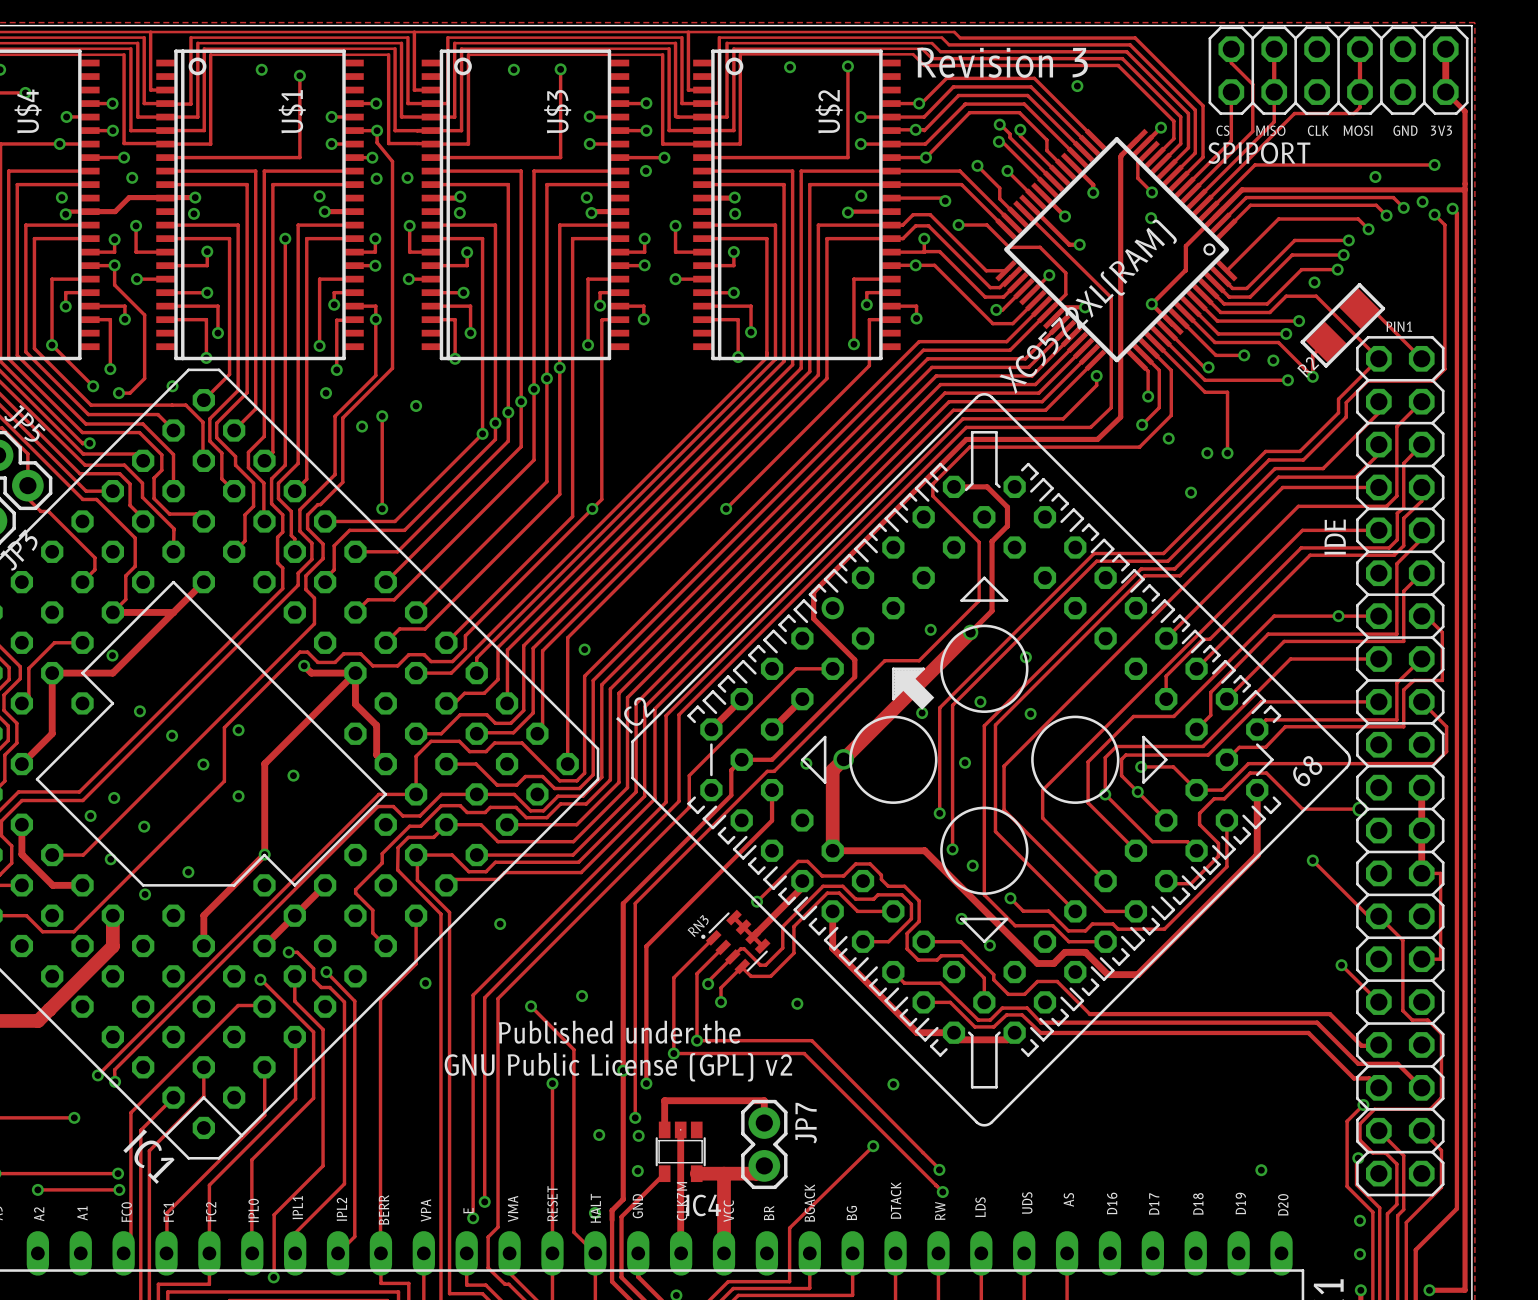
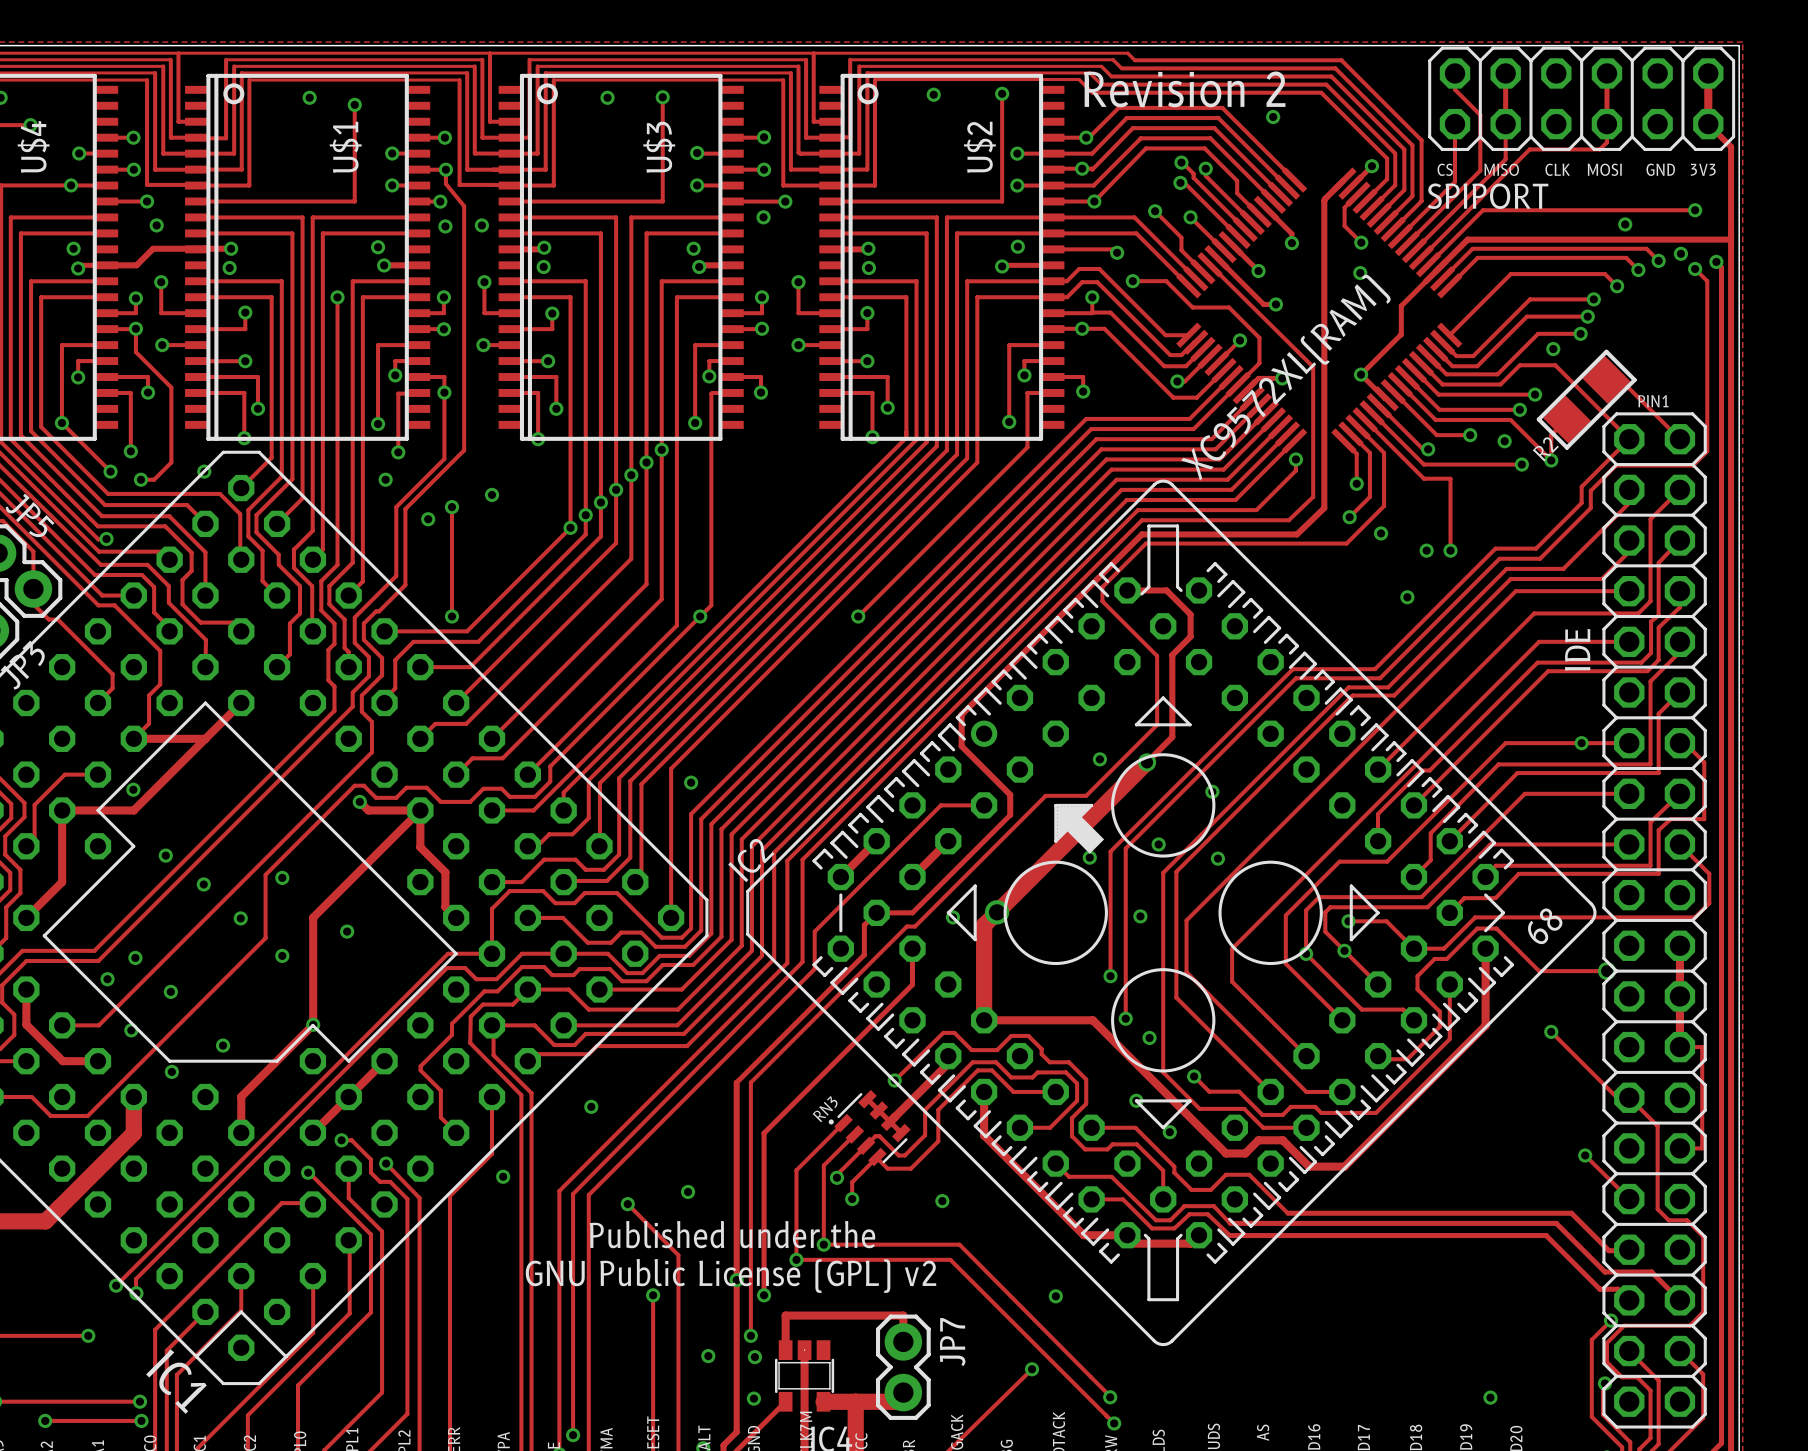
text: Revision 3 (1002, 62) -> Revision 2 (1184, 89)
drawing: [1203, 243, 1216, 256] -> none
line: (1007, 249) (1116, 139) (1226, 250) (1116, 360) (1006, 249) -> none

